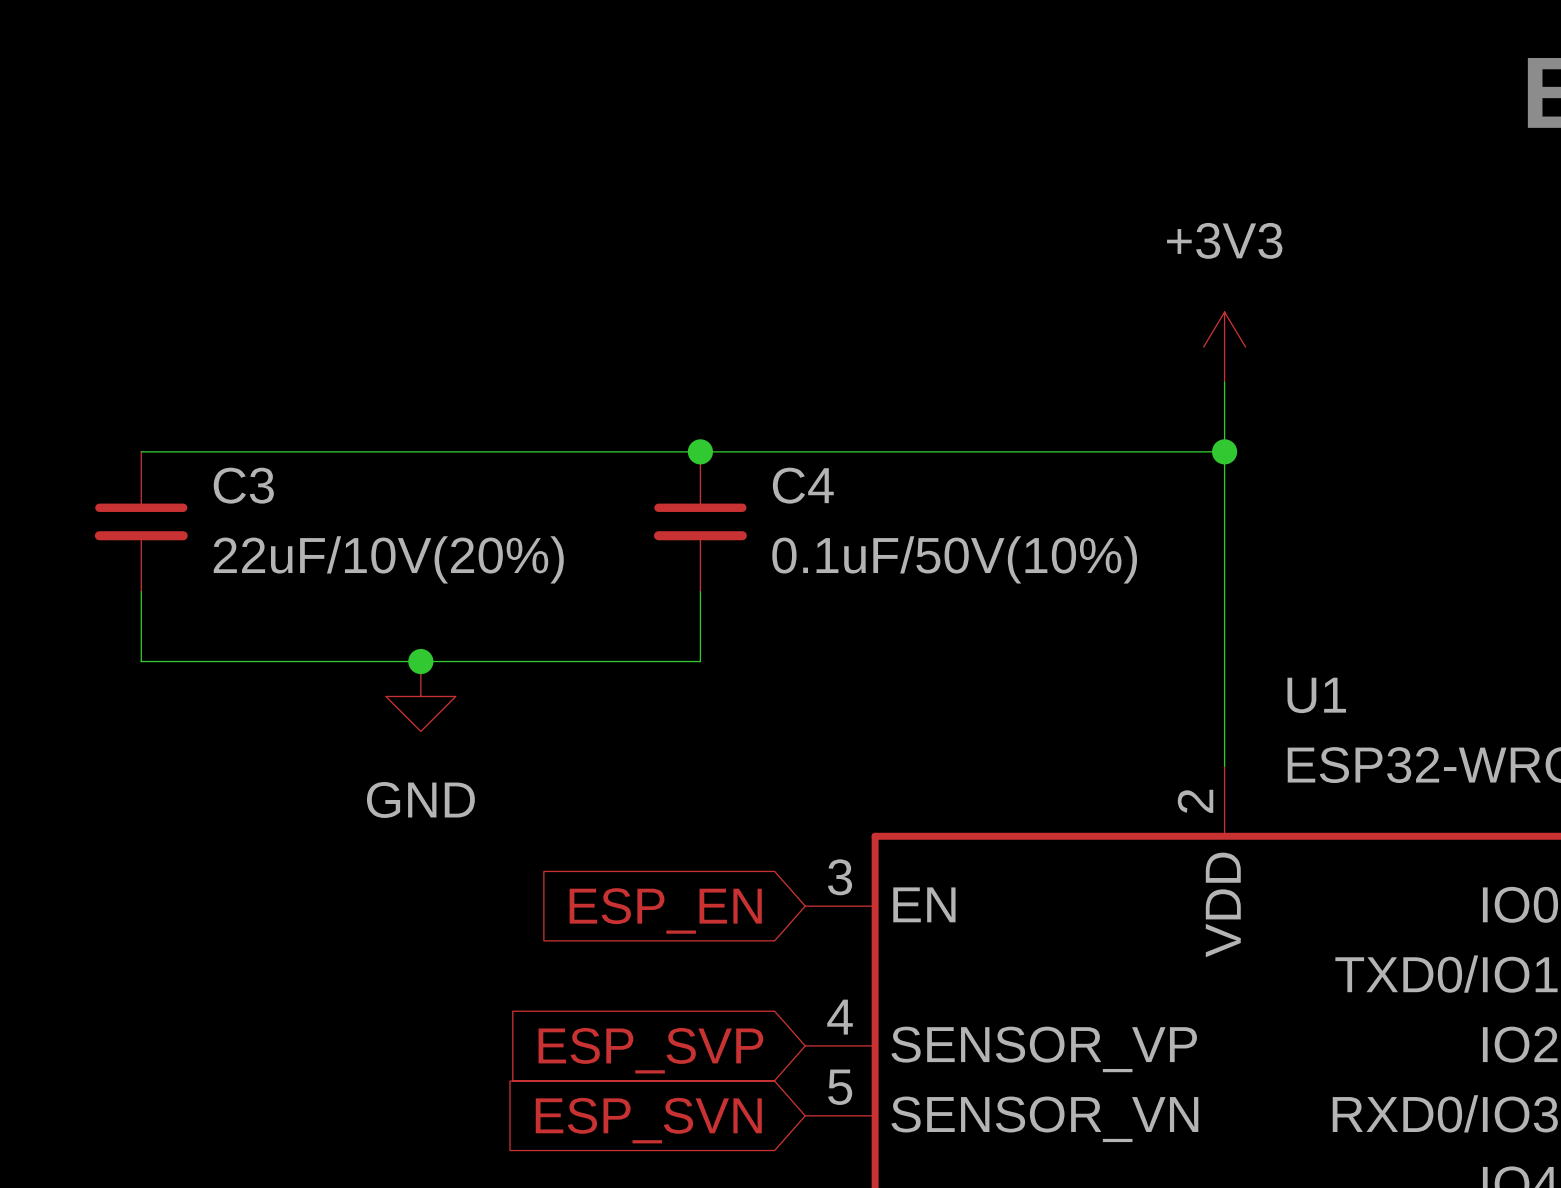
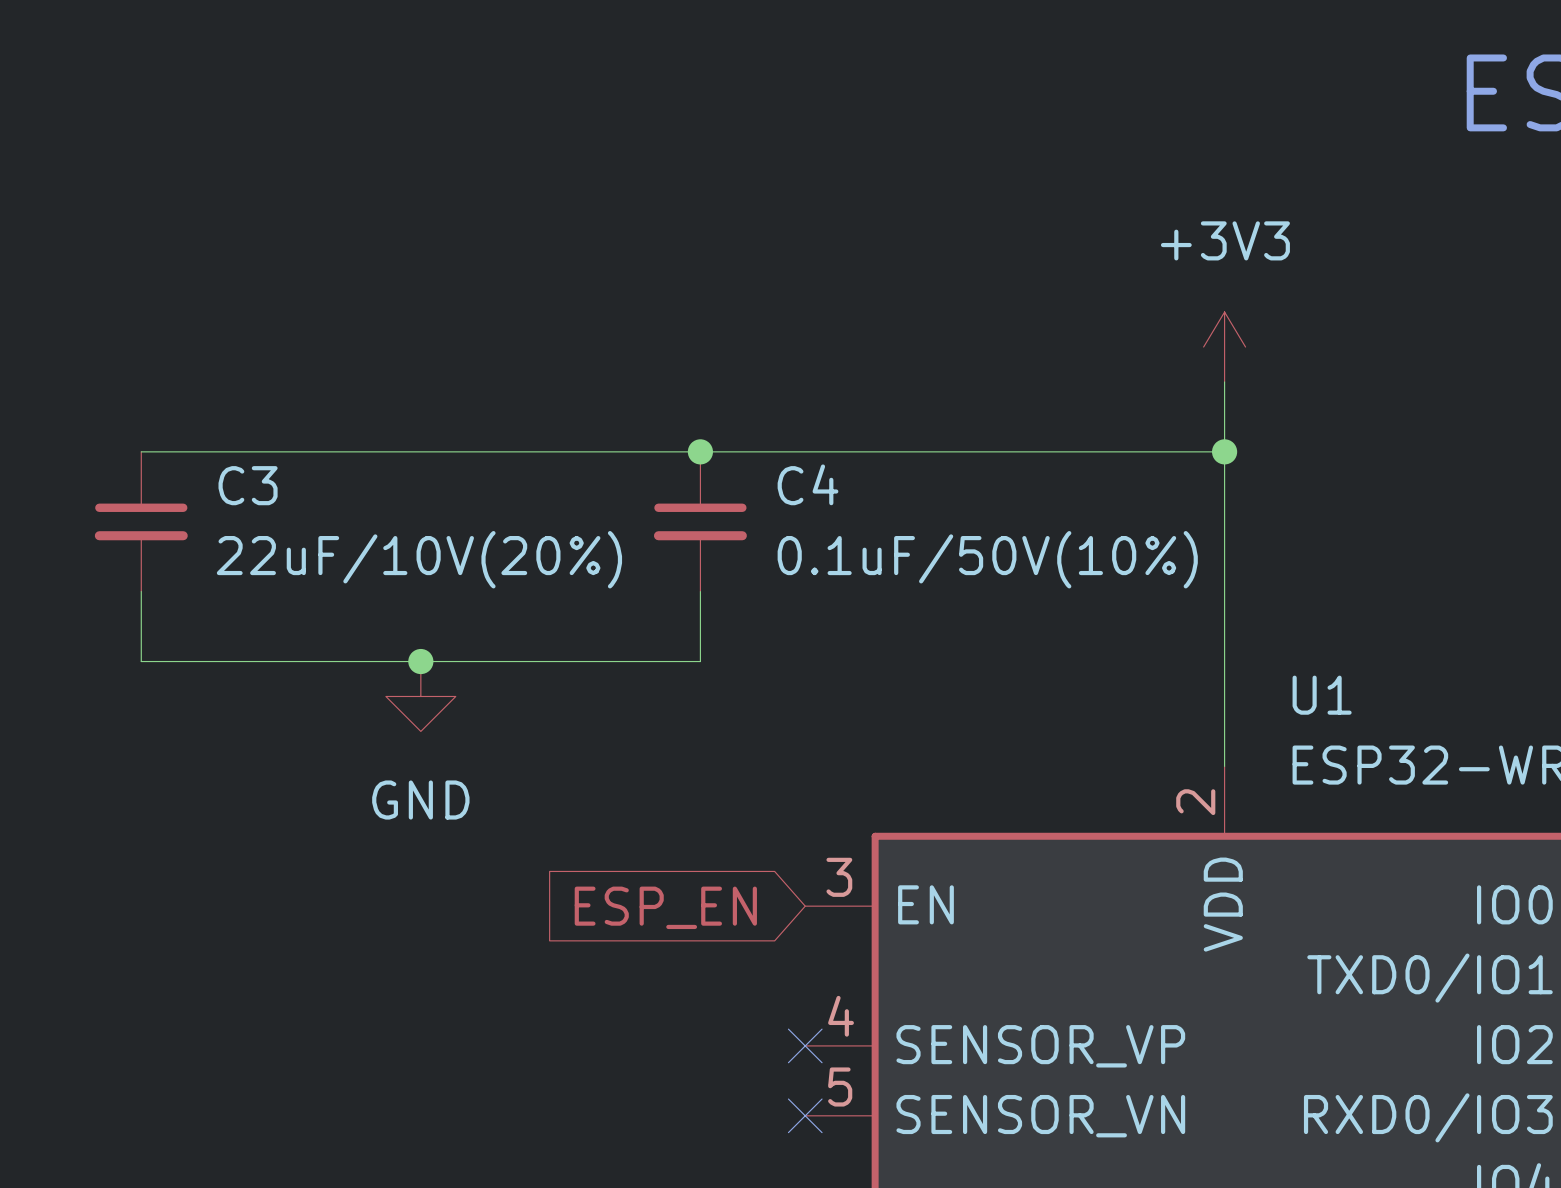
no-connect mark: none -> (805, 1045)
global label: ESP_SVP (650, 1050) -> none
no-connect mark: none -> (805, 1115)
global label: ESP_SVN (648, 1120) -> none

